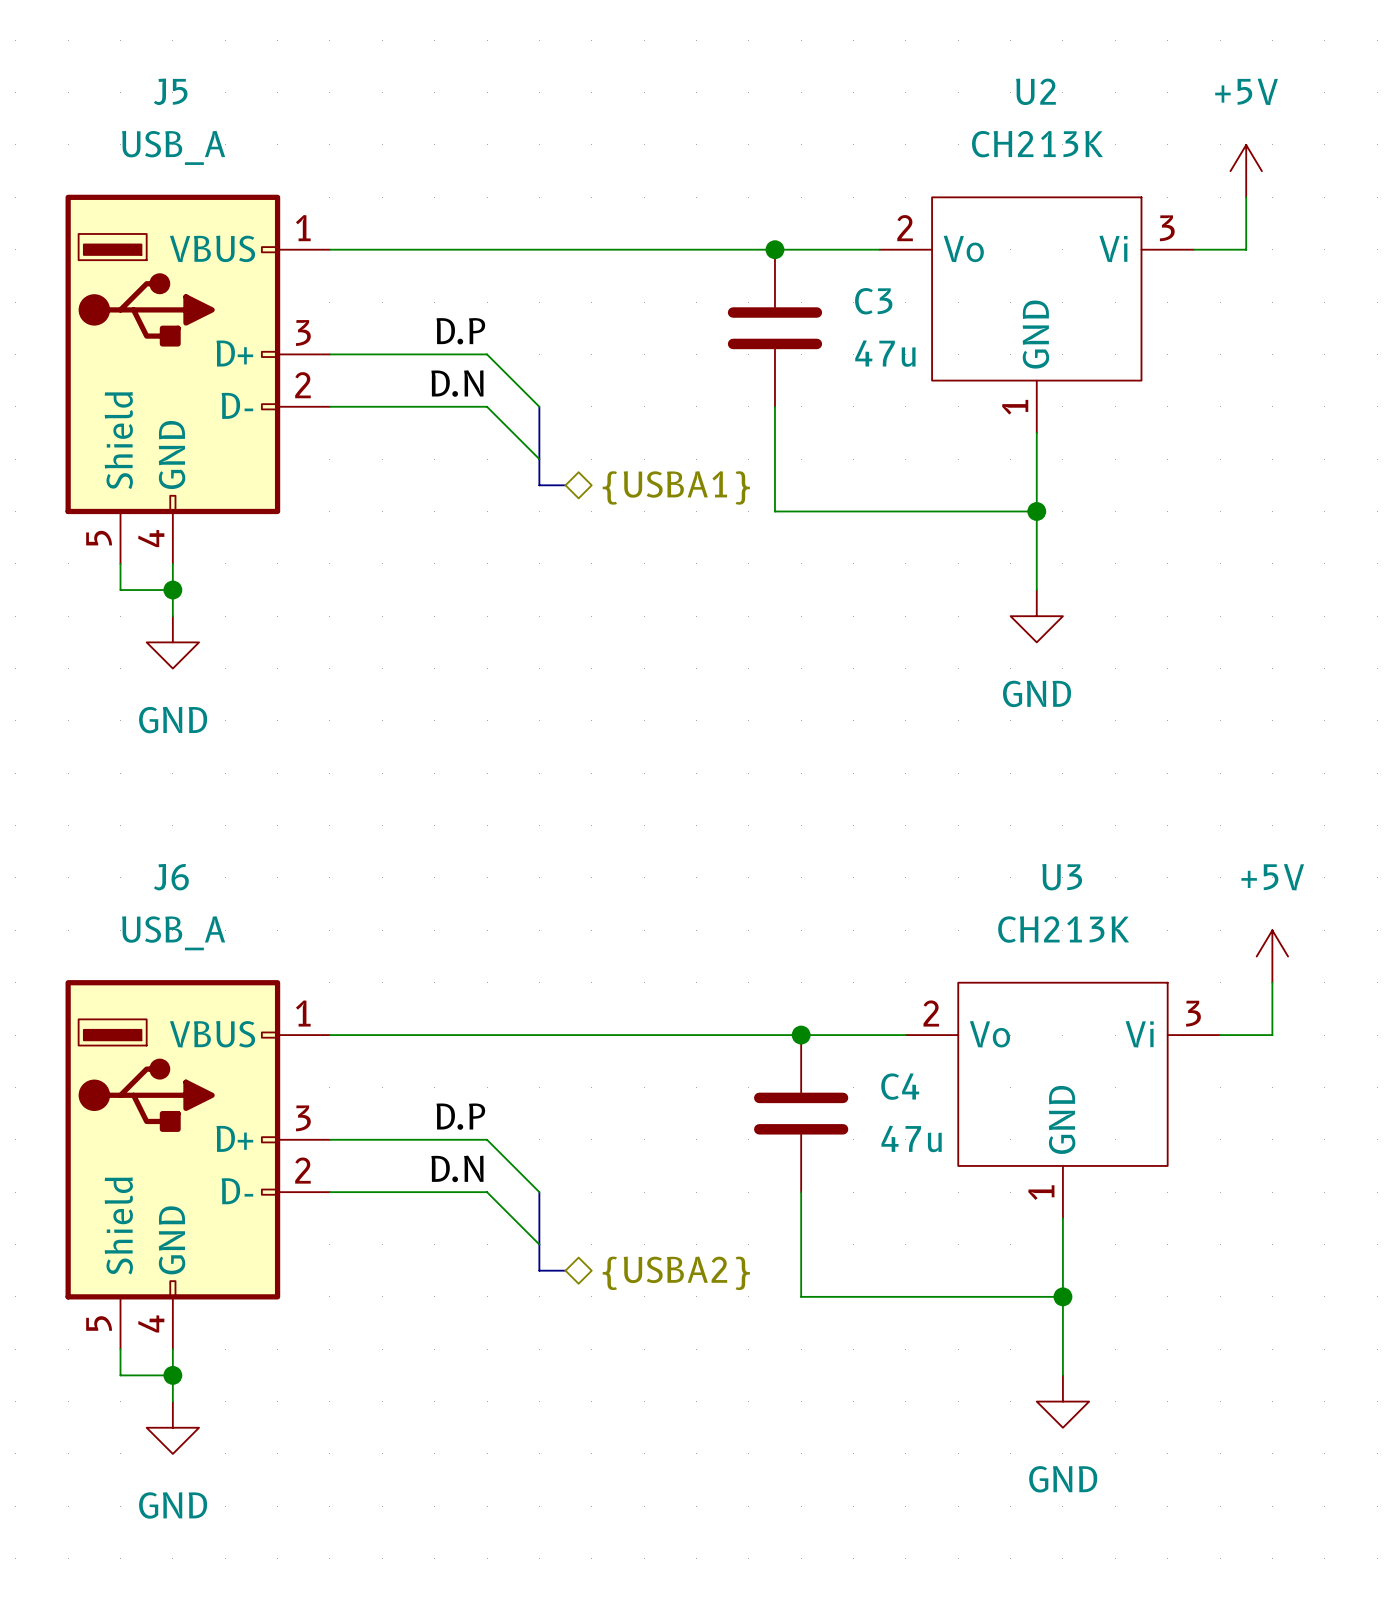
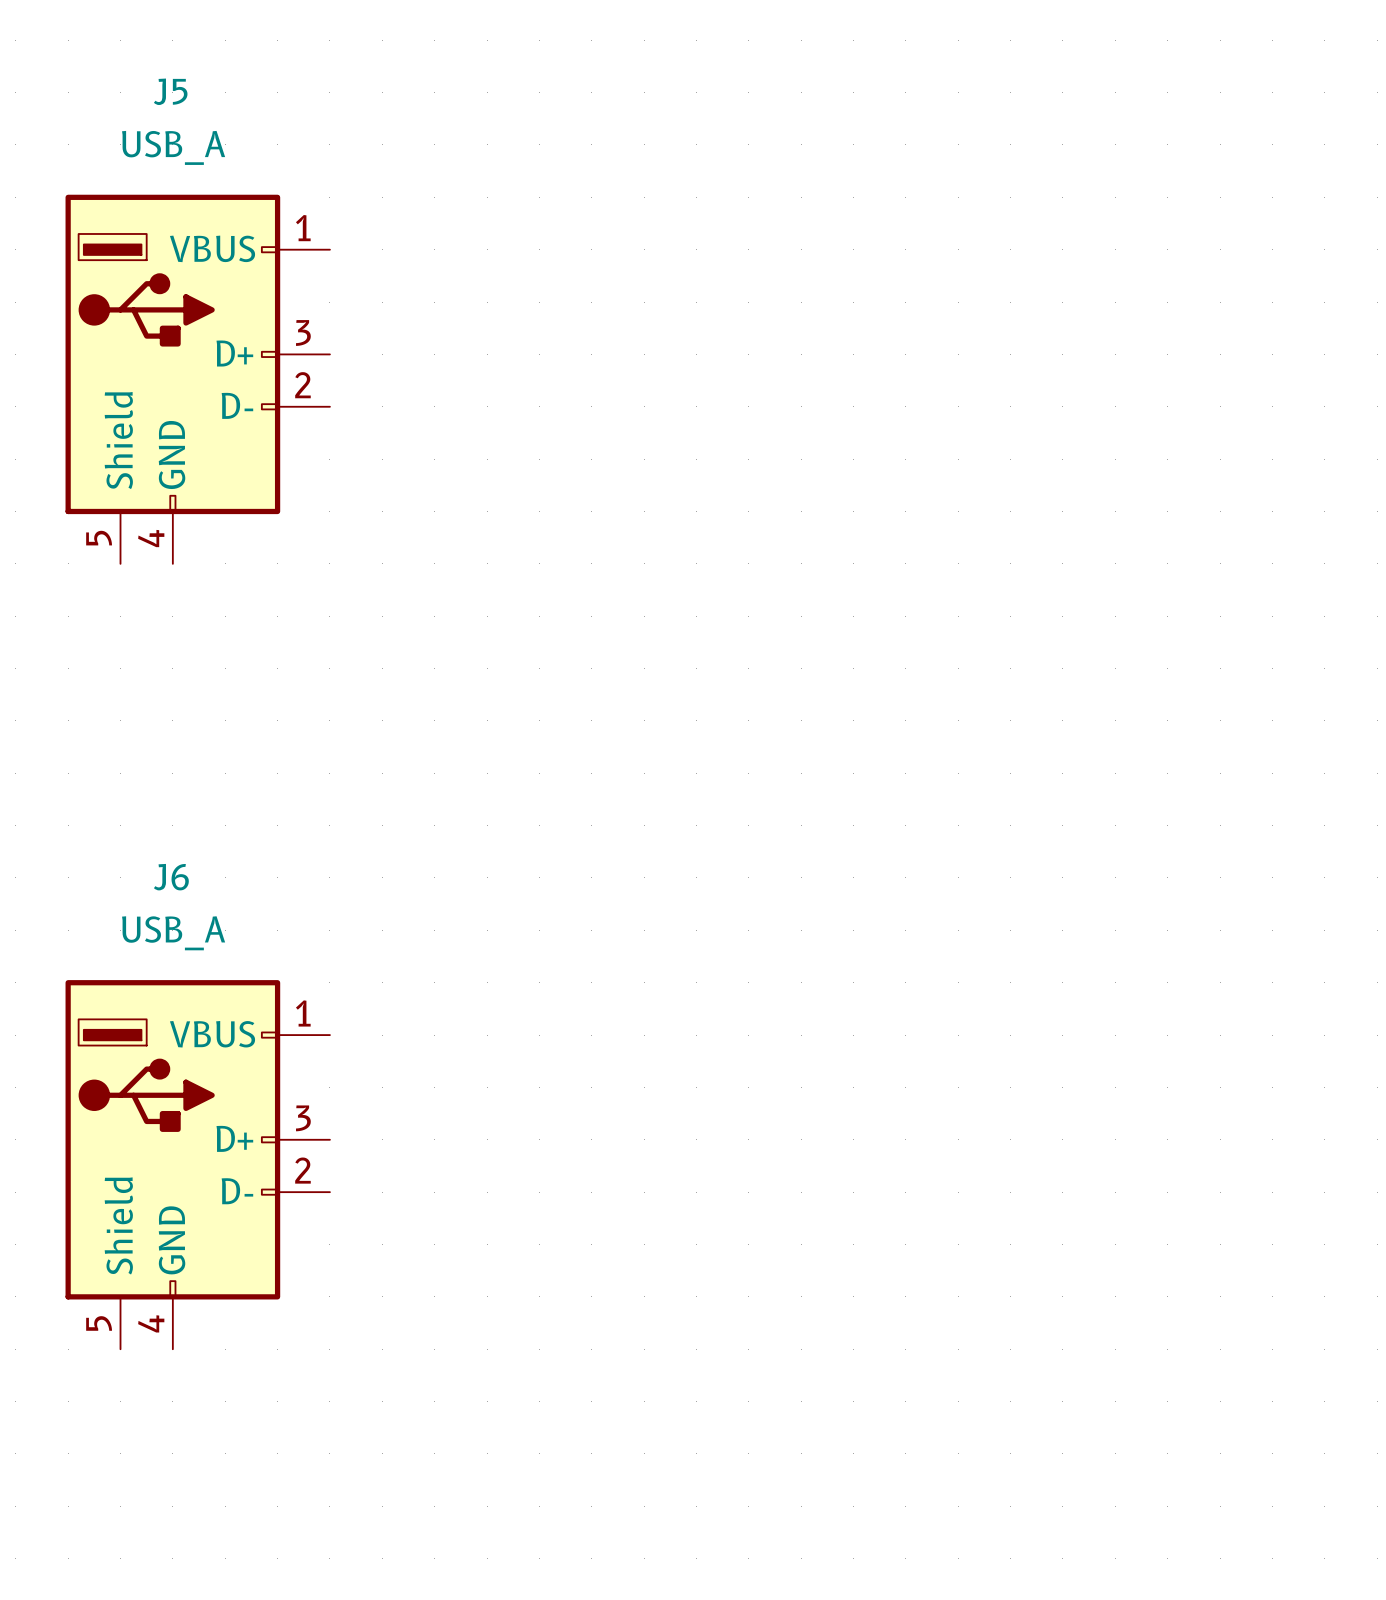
power symbol: +5V (1246, 171) -> none
wire: (1246, 197) (1246, 249) (1193, 249) -> none
wire: (329, 249) (879, 249) -> none
junction: (774, 249) -> none
U2: CH213K (1036, 315) -> none
C3: 47u (774, 328) -> none
label: D.P (460, 331) -> none
wire: (329, 354) (487, 354) (539, 406) -> none
label: D.N (457, 383) -> none
wire: (329, 406) (487, 406) (539, 459) -> none
bus: (539, 406) (539, 485) (565, 485) -> none
wire: (774, 406) (774, 511) (1036, 511) -> none
wire: (1036, 432) (1036, 590) -> none
hierarchical label: {USBA1} (676, 487) -> none
junction: (1036, 511) -> none
wire: (120, 563) (120, 590) (172, 590) -> none
wire: (172, 563) (172, 616) -> none
junction: (172, 590) -> none
power symbol: GND (1036, 616) -> none
power symbol: GND (172, 642) -> none
power symbol: +5V (1272, 956) -> none
wire: (1272, 982) (1272, 1035) (1220, 1035) -> none
wire: (329, 1035) (905, 1035) -> none
junction: (801, 1035) -> none
U3: CH213K (1062, 1100) -> none
C4: 47u (801, 1113) -> none
label: D.P (460, 1116) -> none
wire: (329, 1139) (487, 1139) (539, 1192) -> none
label: D.N (457, 1168) -> none
wire: (329, 1192) (487, 1192) (539, 1244) -> none
bus: (539, 1192) (539, 1270) (565, 1270) -> none
wire: (801, 1192) (801, 1296) (1062, 1296) -> none
wire: (1062, 1218) (1062, 1375) -> none
hierarchical label: {USBA2} (676, 1273) -> none
junction: (1062, 1296) -> none
wire: (120, 1349) (120, 1375) (172, 1375) -> none
wire: (172, 1349) (172, 1401) -> none
junction: (172, 1375) -> none
power symbol: GND (1062, 1401) -> none
power symbol: GND (172, 1427) -> none

